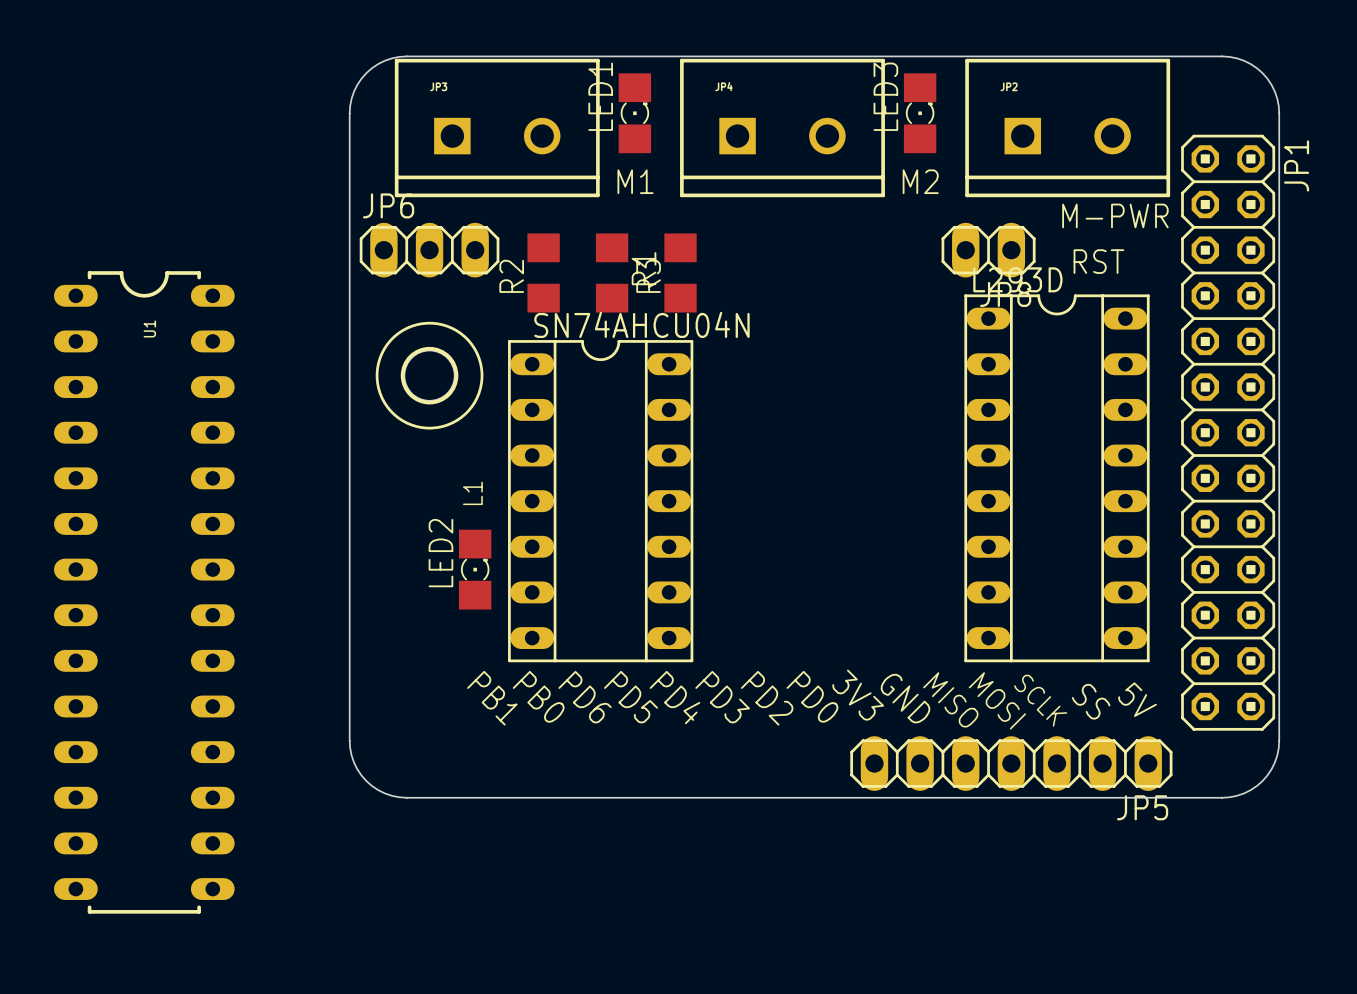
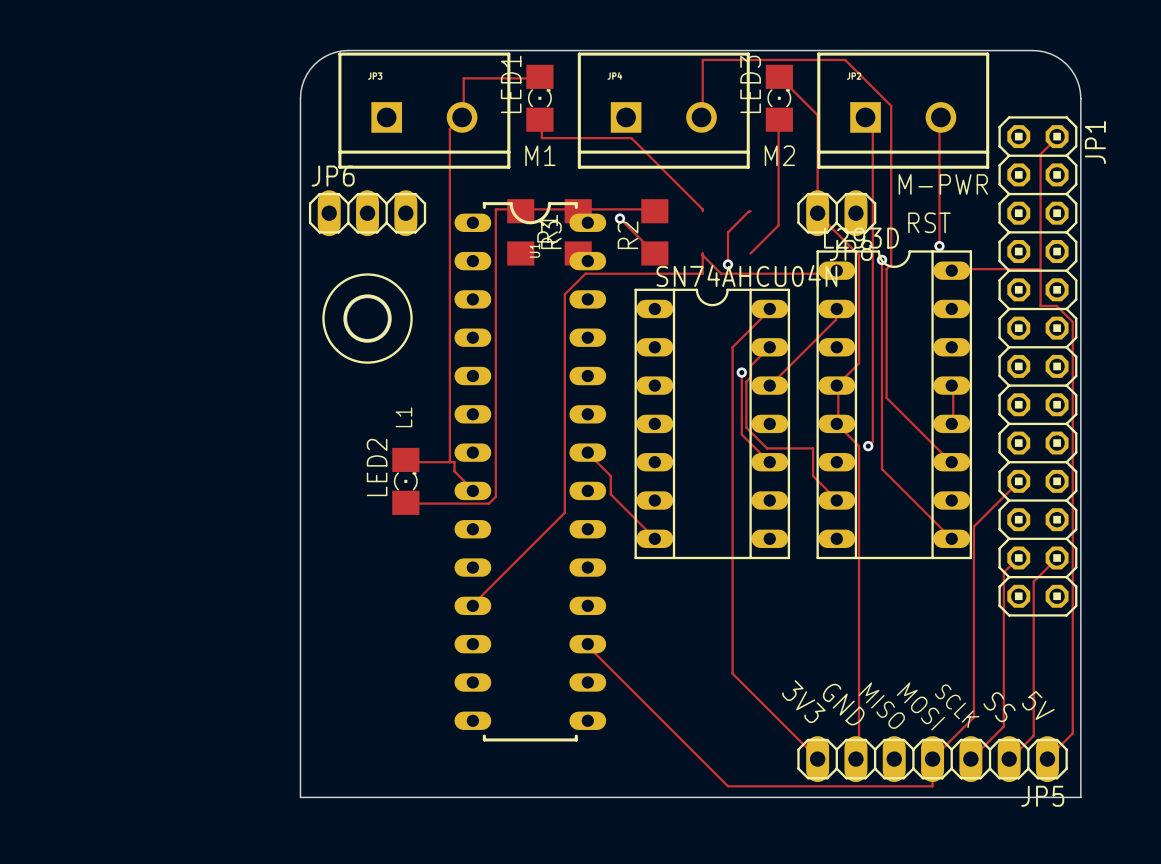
track: none -> (539, 76) (539, 78) (463, 78) (463, 117) (449, 128) (449, 462)
track: none -> (779, 76) (817, 115) (817, 213) (859, 255) (859, 363) (836, 385) (838, 386) (836, 423) (859, 446) (859, 756) (855, 759)
track: none -> (701, 117) (702, 59) (845, 59) (891, 105) (891, 264) (886, 269) (886, 397) (951, 462)
track: none -> (865, 117) (872, 124) (872, 441) (868, 446)
track: none -> (940, 117) (939, 246)
track: none -> (539, 119) (541, 119) (541, 138) (631, 138) (702, 211)
track: none -> (779, 119) (778, 225) (750, 253)
track: none -> (1057, 136) (1040, 154) (1040, 305) (1056, 305) (1072, 322) (1072, 733) (1047, 759)
track: none -> (654, 211) (654, 209) (495, 209) (495, 496) (488, 503) (405, 502)
track: none -> (750, 211) (728, 232) (728, 264)
track: none -> (619, 218) (654, 253)
via: none -> (619, 218)
R2 position: (543, 272) -> (654, 232)
via: none -> (939, 246)
track: none -> (702, 253) (702, 273) (585, 273) (564, 294) (564, 512) (472, 605)
track: none -> (702, 255) (721, 273) (836, 273) (836, 270)
track: none -> (882, 259) (882, 469) (951, 538)
via: none -> (882, 259)
via: none -> (728, 264)
track: none -> (1040, 269) (953, 269) (951, 270)
track: none -> (769, 308) (732, 347) (732, 673) (817, 759)
track: none -> (836, 308) (836, 319) (769, 385)
track: none -> (769, 347) (750, 365) (750, 377) (746, 381) (746, 427) (767, 448) (813, 448) (813, 476) (836, 500)
track: none -> (741, 372) (741, 434) (769, 462)
via: none -> (741, 372)
track: none -> (951, 385) (953, 386) (951, 423)
SN74AHCU04N position: (600, 501) -> (712, 423)
via: none -> (868, 446)
track: none -> (587, 452) (610, 476) (610, 494) (654, 538)
track: none -> (405, 459) (406, 462) (454, 462) (454, 471) (472, 490)
track: none -> (1018, 481) (973, 526) (973, 717) (932, 758) (932, 786) (728, 786) (587, 644)
U1 position: (144, 592) -> (530, 471)
track: none -> (1018, 557) (1003, 572) (1003, 726) (970, 759)
track: none -> (1057, 557) (1033, 581) (1033, 735) (1009, 759)
text position: 3V3 (858, 695) -> 3V3 (803, 701)
text: PB0 (538, 696) -> none
text: PD0 (812, 696) -> none
text: PD6 (585, 697) -> none
text: PD5 (631, 697) -> none
text: PD4 (674, 697) -> none
text: PD3 (722, 697) -> none
text: PB1 (492, 698) -> none
text: PD2 (767, 698) -> none
text position: GND (905, 698) -> GND (843, 704)
text position: MISO (950, 699) -> MISO (881, 705)
text position: 5V (1137, 699) -> 5V (1038, 705)
text position: MOSI (997, 700) -> MOSI (920, 706)
text position: SCLK (1040, 700) -> SCLK (957, 706)
text position: SS (1091, 701) -> SS (999, 707)
board edge: (349, 740) (354, 762) (366, 781) (384, 793) (406, 797) (1222, 797) (1244, 793) (1262, 781) (1274, 762) (1279, 740) -> (300, 625) (300, 797) (1080, 797) (1080, 625)
JP5 position: (1011, 763) -> (932, 759)

